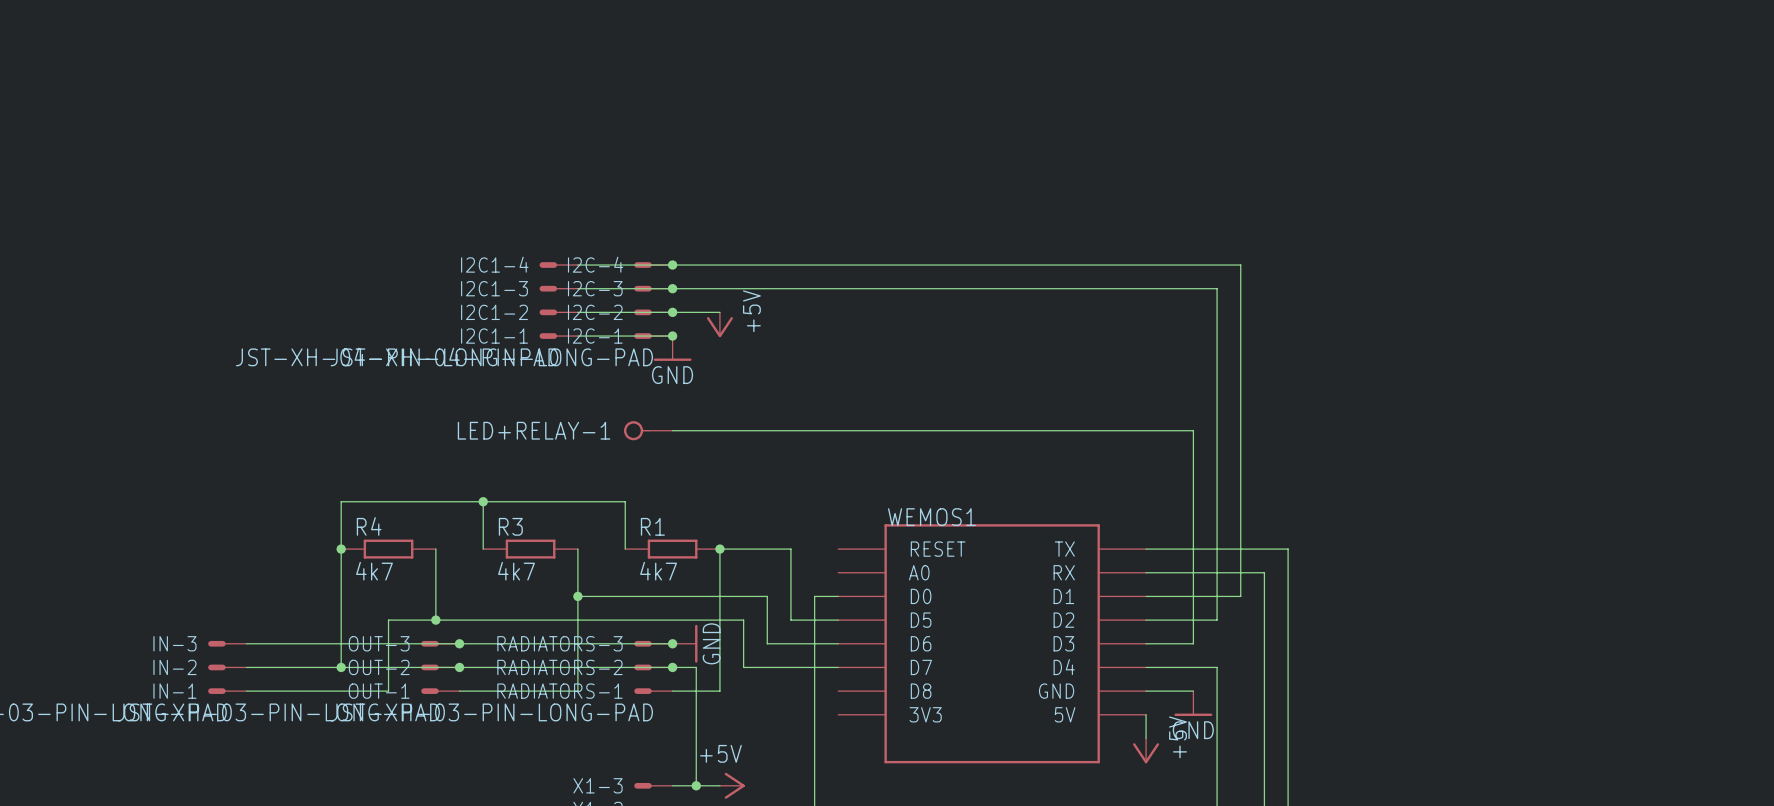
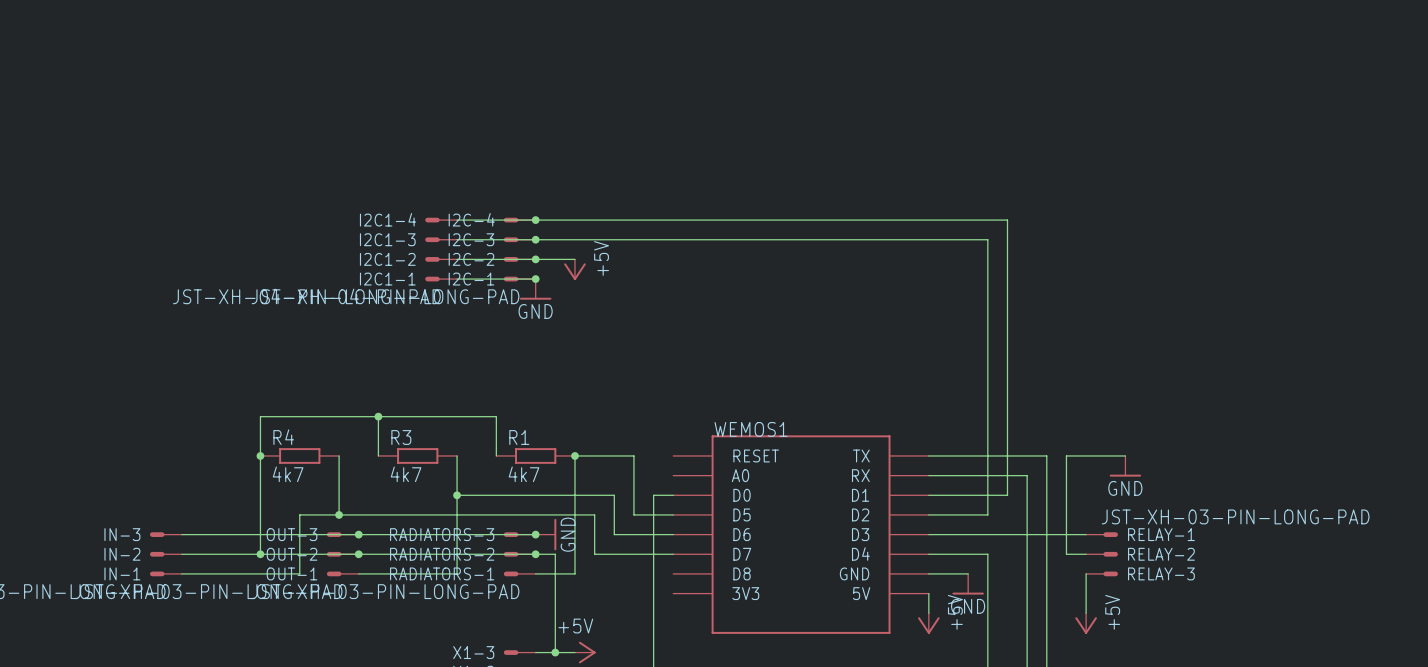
LED+RELAY-1: (648, 430) -> none
wire: (672, 430) (1193, 430) (1193, 643) -> (1086, 534) (968, 534)
wire: none -> (1125, 455) (1066, 455) (1066, 554) (1086, 554)
power symbol: none -> GND (1125, 466)
RELAY-1: none -> JST-XH-03-PIN-LONG-PAD (1102, 534)
RELAY-2: none -> (1102, 554)
wire: none -> (1086, 573) (1086, 613)
RELAY-3: none -> (1102, 573)
power symbol: none -> +5V (1086, 623)

